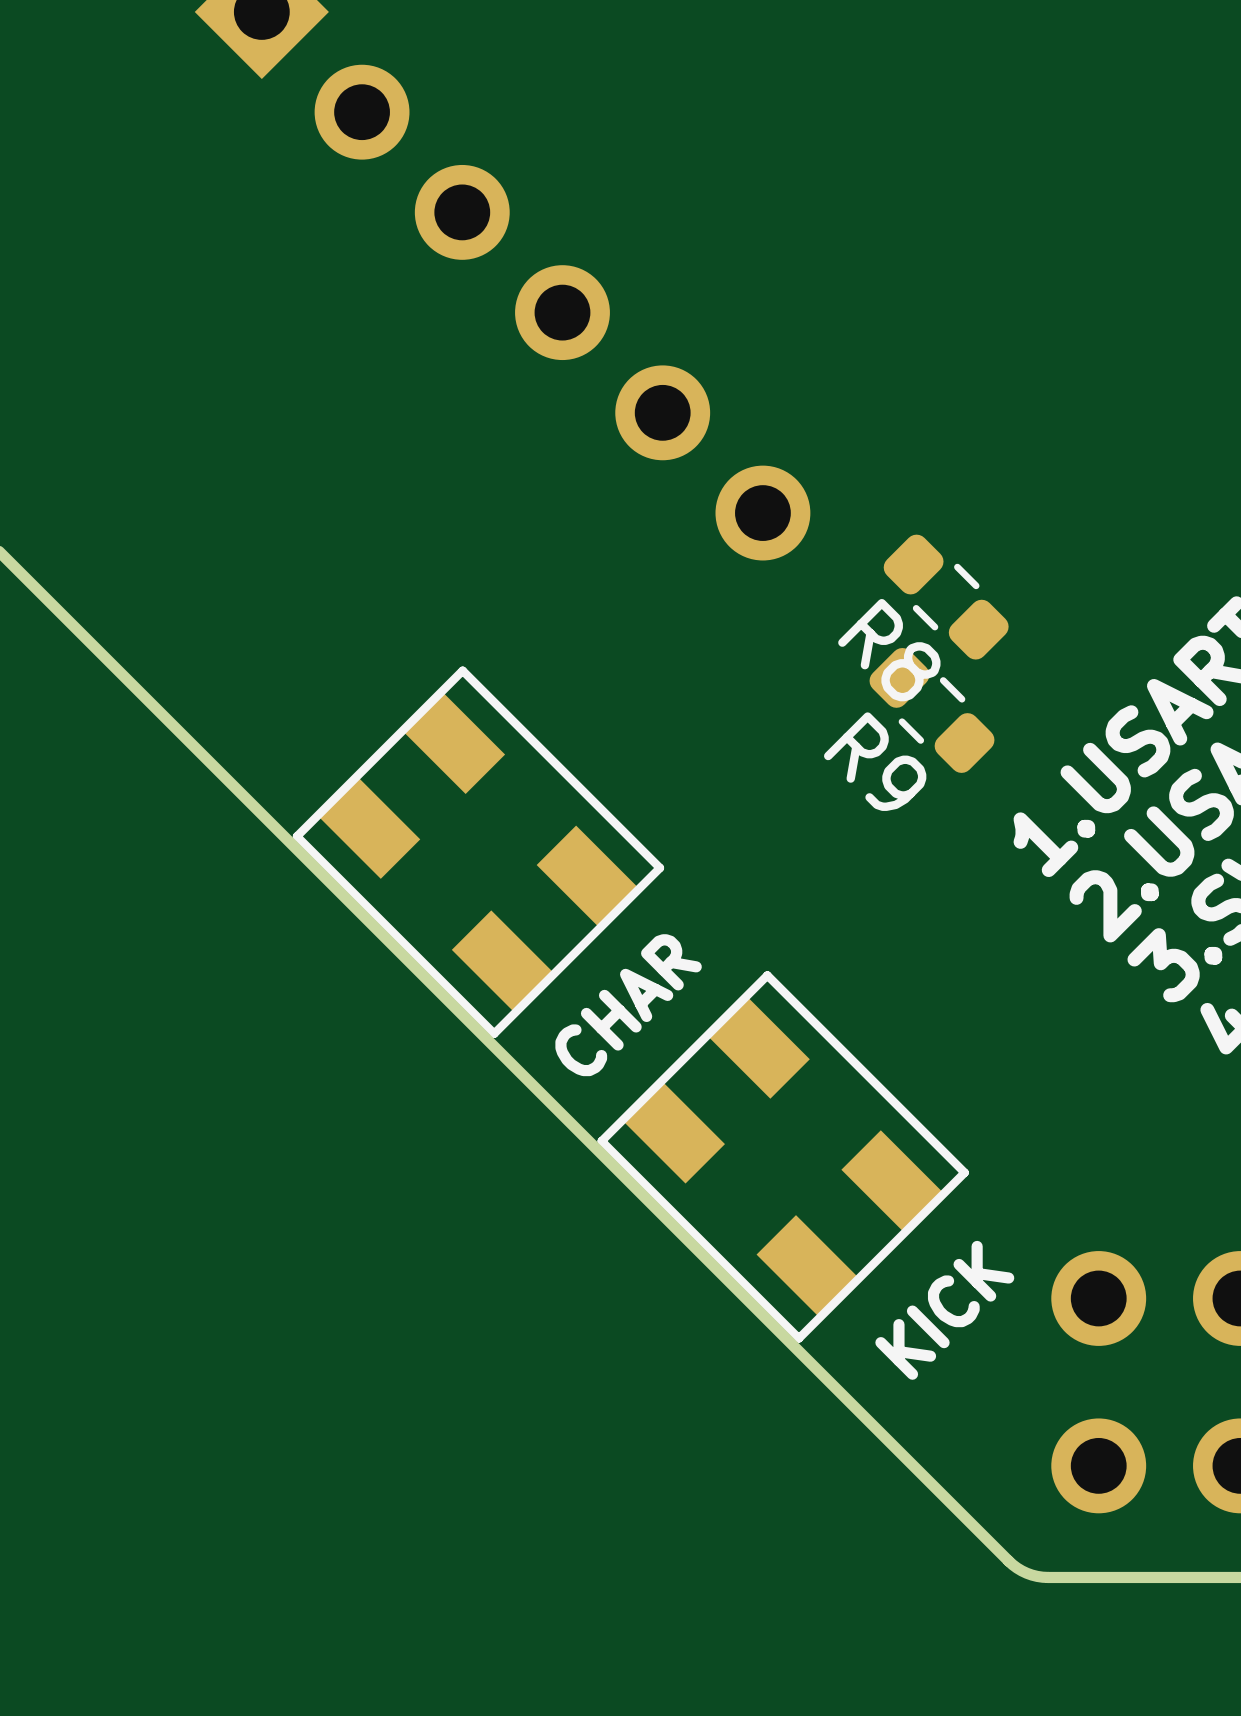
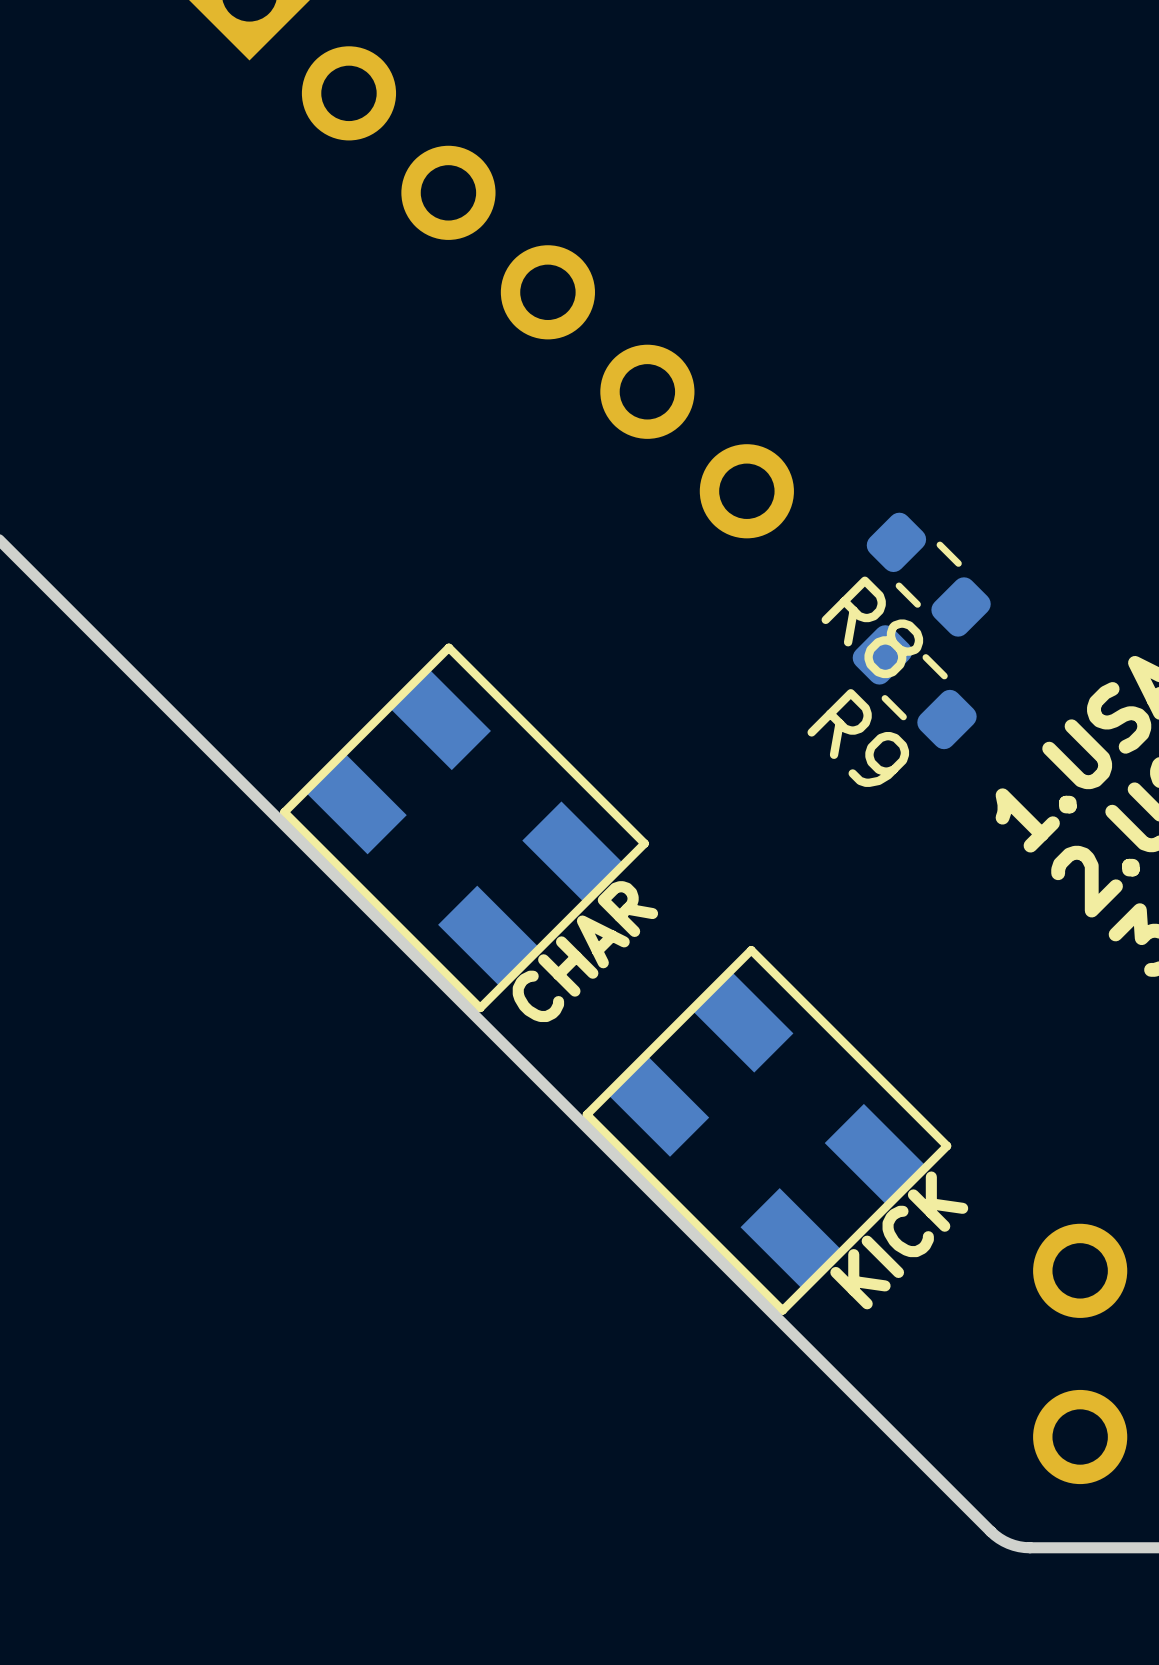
text position: CHAR (628, 1005) -> CHAR (585, 951)
text position: KICK (944, 1310) -> KICK (899, 1240)

